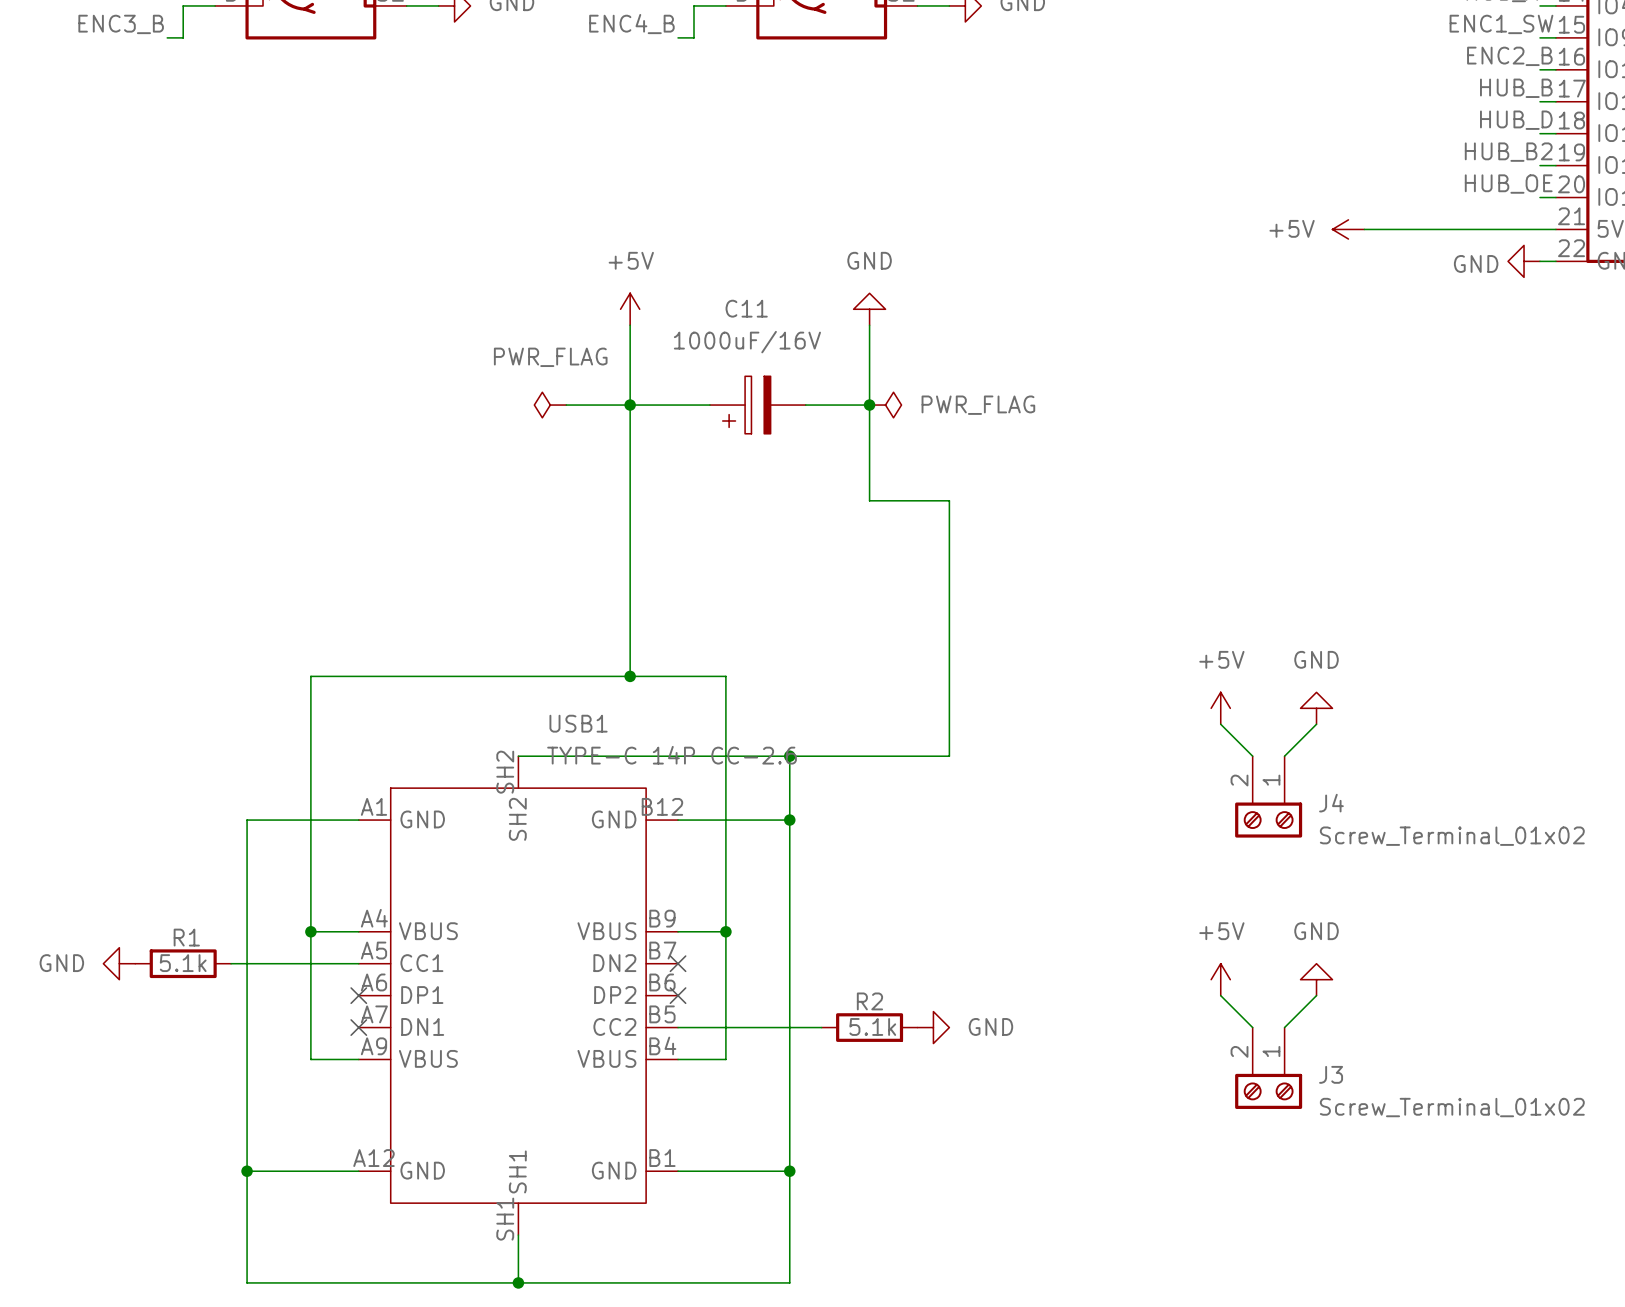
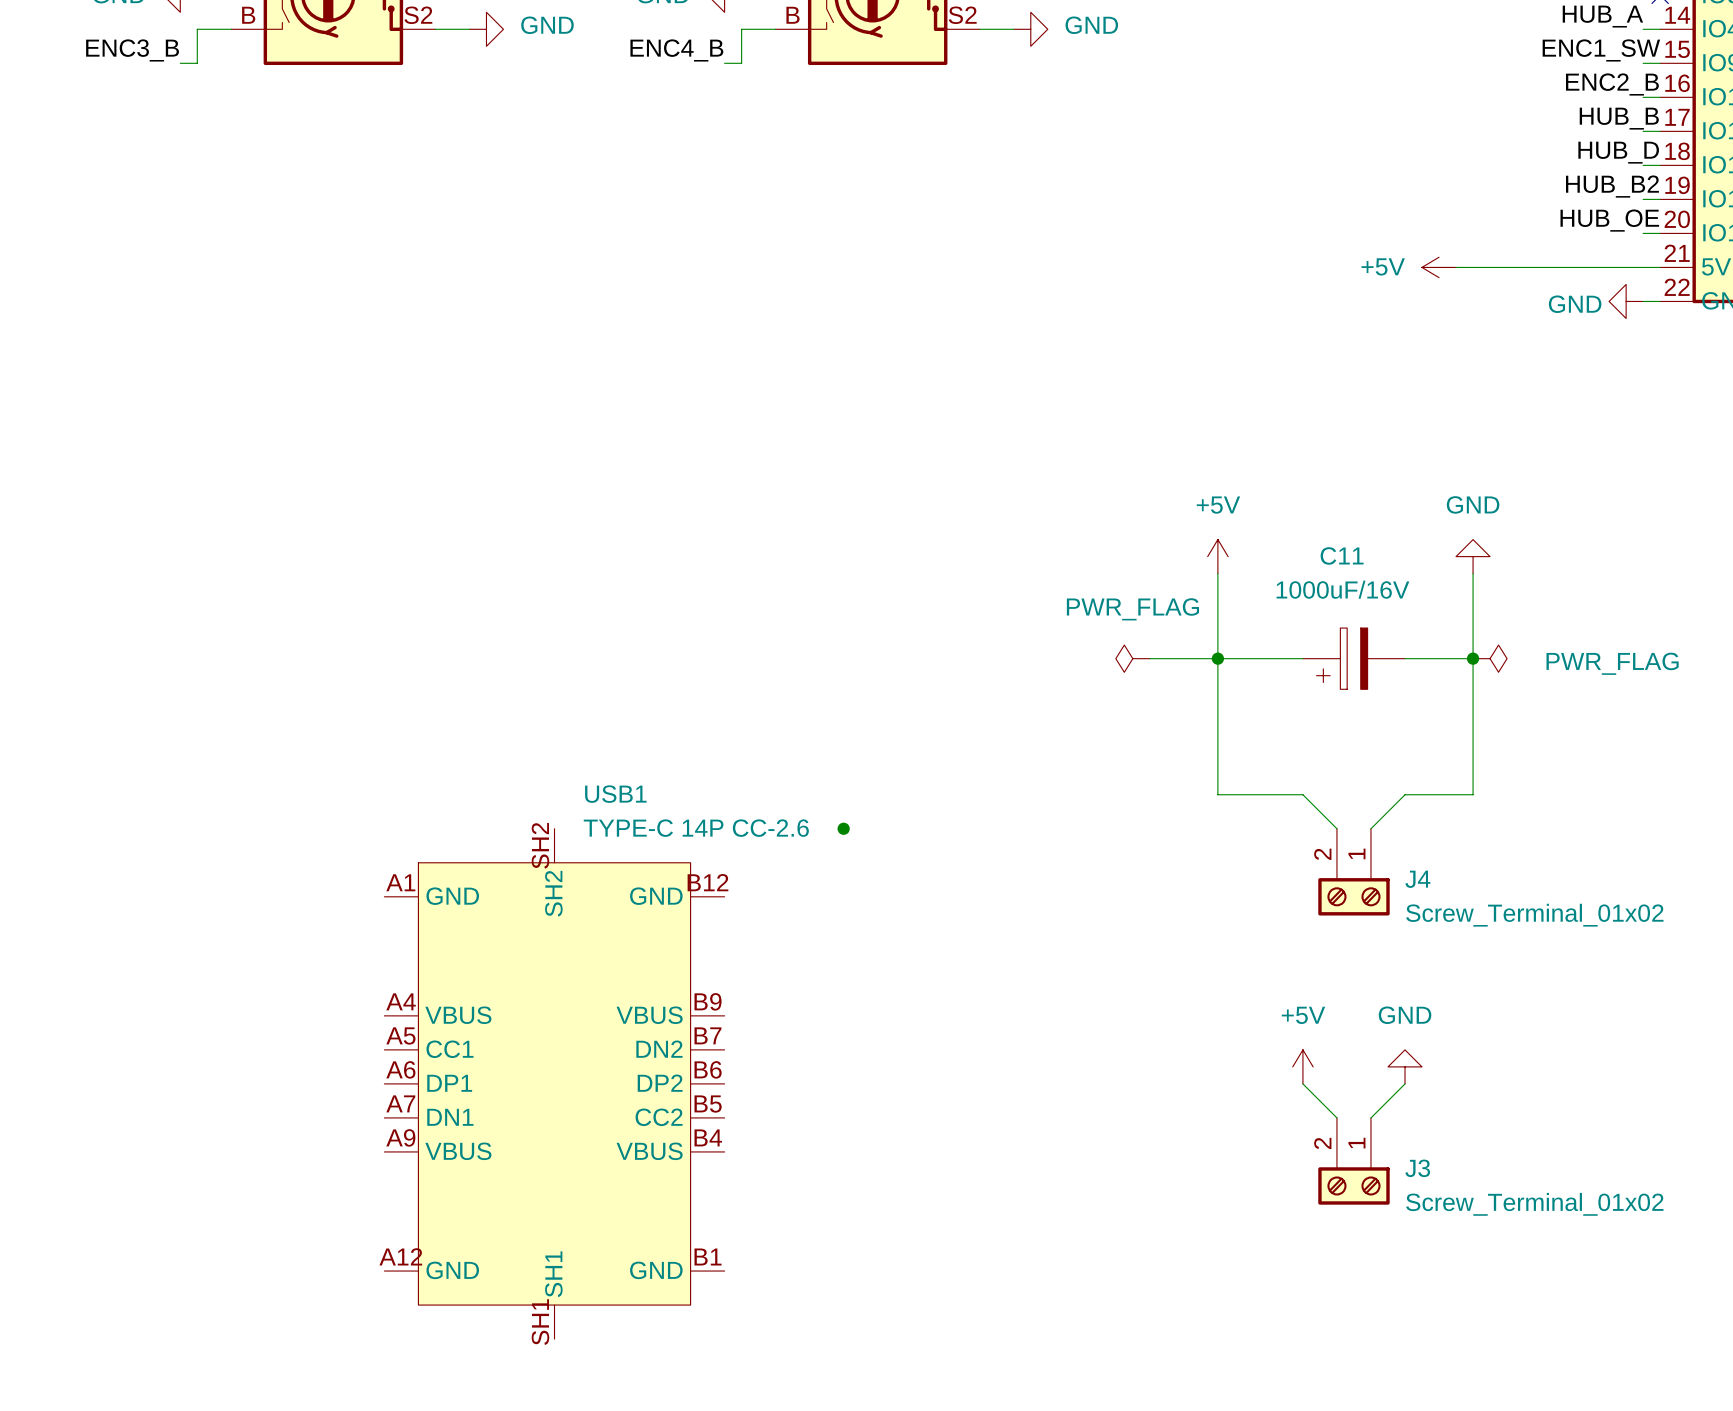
power symbol: +5V (630, 309) -> none
power symbol: GND (869, 309) -> none
wire: (630, 325) (630, 676) -> none
wire: (869, 325) (869, 500) (949, 500) (949, 756) (518, 756) -> none
power symbol: PWR_FLAG (550, 405) -> none
wire: (566, 405) (709, 405) -> none
junction: (630, 405) -> none
C11 position: (757, 405) -> (1353, 658)
wire: (805, 405) (869, 405) -> none
junction: (869, 405) -> none
power symbol rotation: 0° (885, 405) -> 180° (1132, 658)
power symbol position: PWR_FLAG (885, 405) -> PWR_FLAG (1132, 658)
power symbol text position: PWR_FLAG (978, 405) -> PWR_FLAG (1132, 609)
wire: none -> (1217, 573) (1217, 794) (1302, 794)
wire: none -> (1473, 573) (1473, 794) (1405, 794)
wire: none -> (1149, 658) (1302, 658)
junction: none -> (1217, 658)
wire: none -> (1405, 658) (1473, 658)
junction: none -> (1473, 658)
power symbol: none -> PWR_FLAG (1490, 658)
junction: (630, 676) -> none
power symbol position: +5V (1220, 708) -> +5V (1217, 556)
power symbol position: GND (1316, 708) -> GND (1473, 556)
wire: (789, 756) (789, 1282) (247, 1282) (247, 820) (358, 820) -> none
wire: (678, 820) (789, 820) -> none
junction: (789, 820) -> none
wire: (310, 931) (358, 931) -> none
junction: (310, 931) -> none
wire: (678, 931) (725, 931) -> none
junction: (725, 931) -> none
power symbol: GND (119, 963) -> none
R1: 5.1k (183, 963) -> none
wire: (231, 963) (358, 963) -> none
no-connect mark: (678, 963) -> none
no-connect mark: (358, 995) -> none
no-connect mark: (678, 995) -> none
no-connect mark: (358, 1027) -> none
wire: (678, 1027) (821, 1027) -> none
R2: 5.1k (869, 1027) -> none
power symbol: GND (933, 1027) -> none
wire: (358, 1059) (310, 1059) (310, 676) (725, 676) (725, 1059) (678, 1059) -> none
wire: (247, 1171) (358, 1171) -> none
junction: (247, 1171) -> none
wire: (678, 1171) (789, 1171) -> none
junction: (789, 1171) -> none
wire: (518, 1235) (518, 1282) -> none
junction: (518, 1282) -> none

